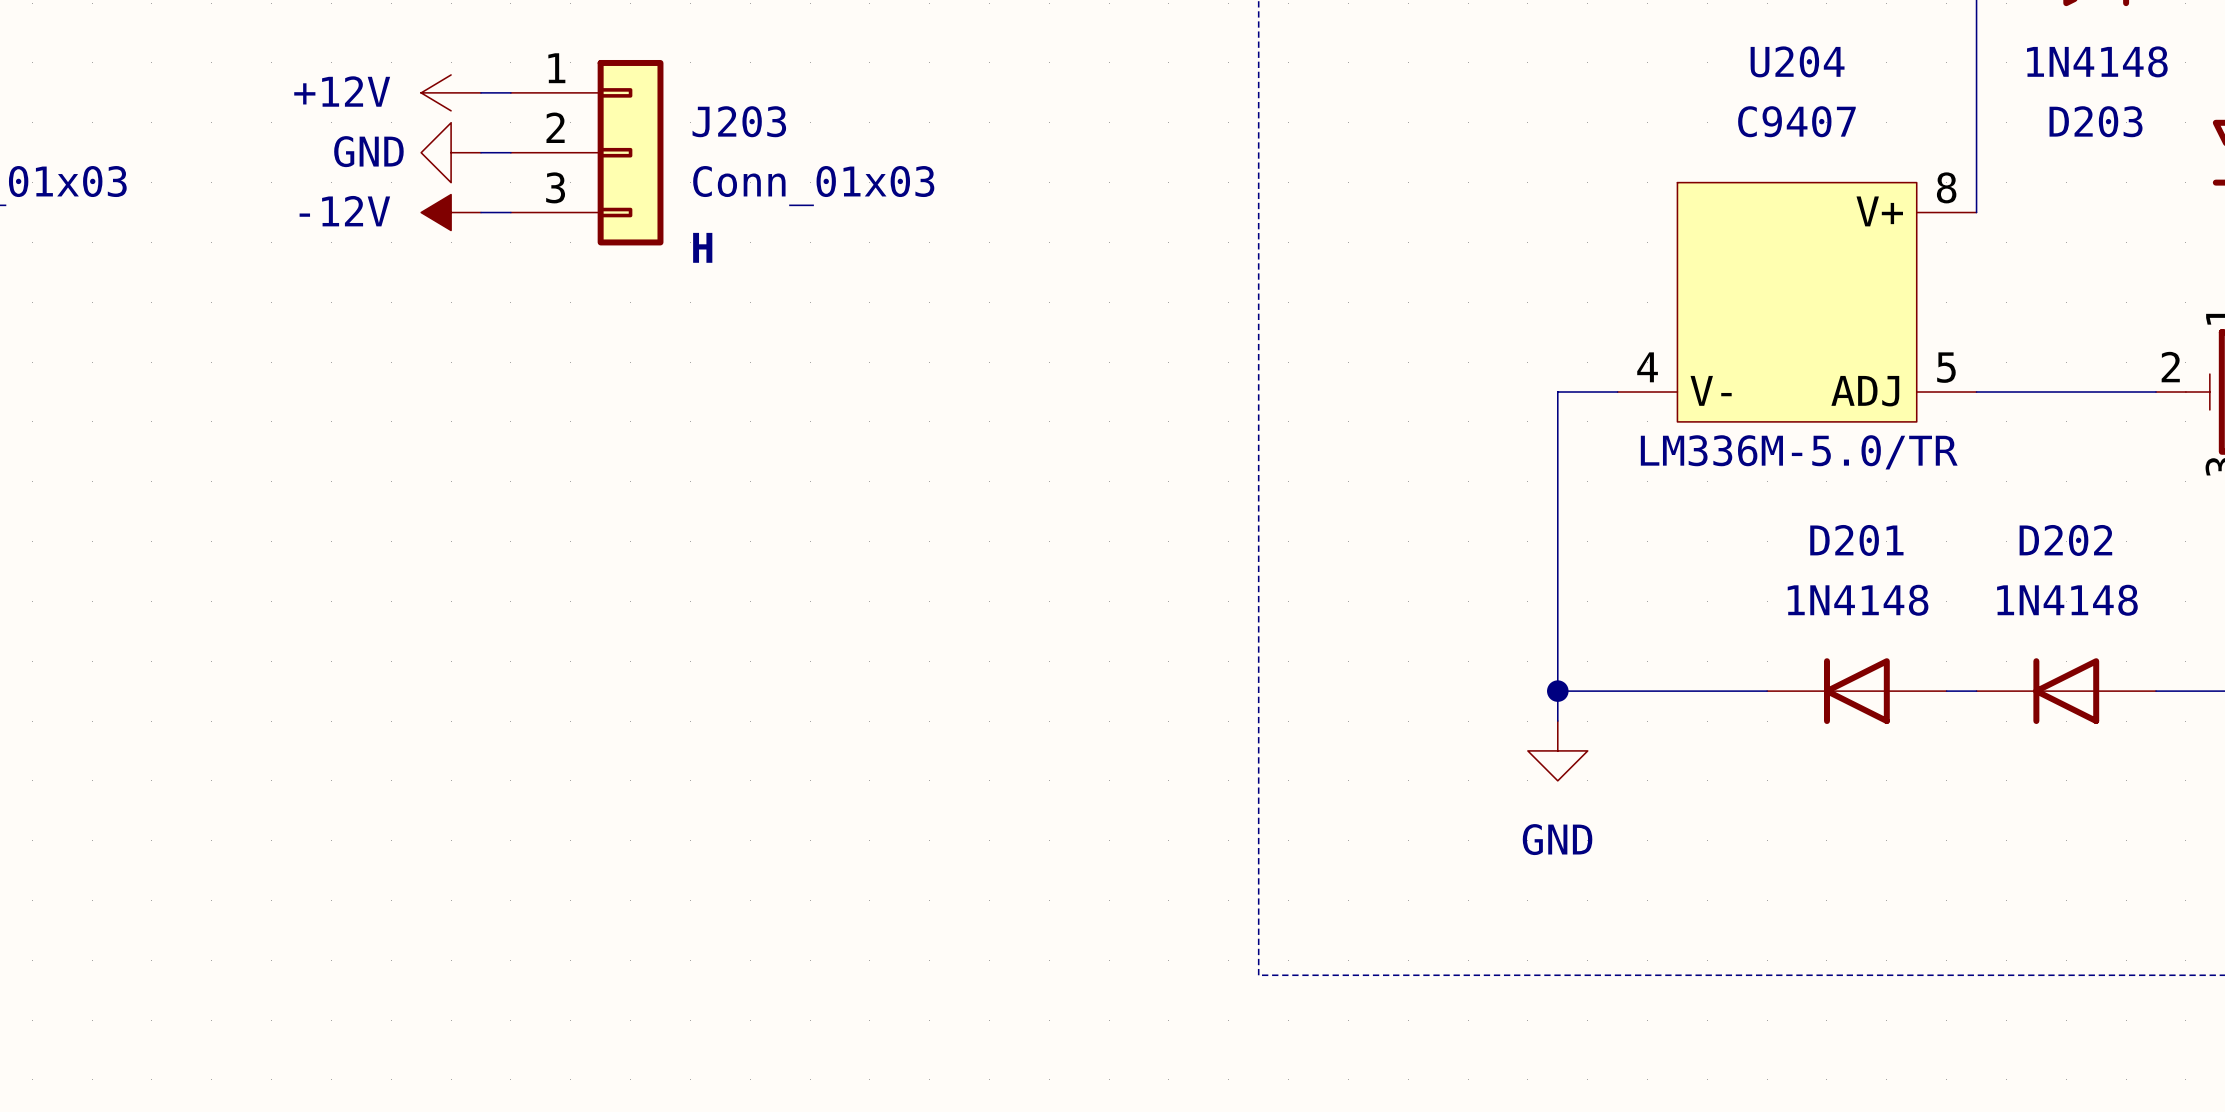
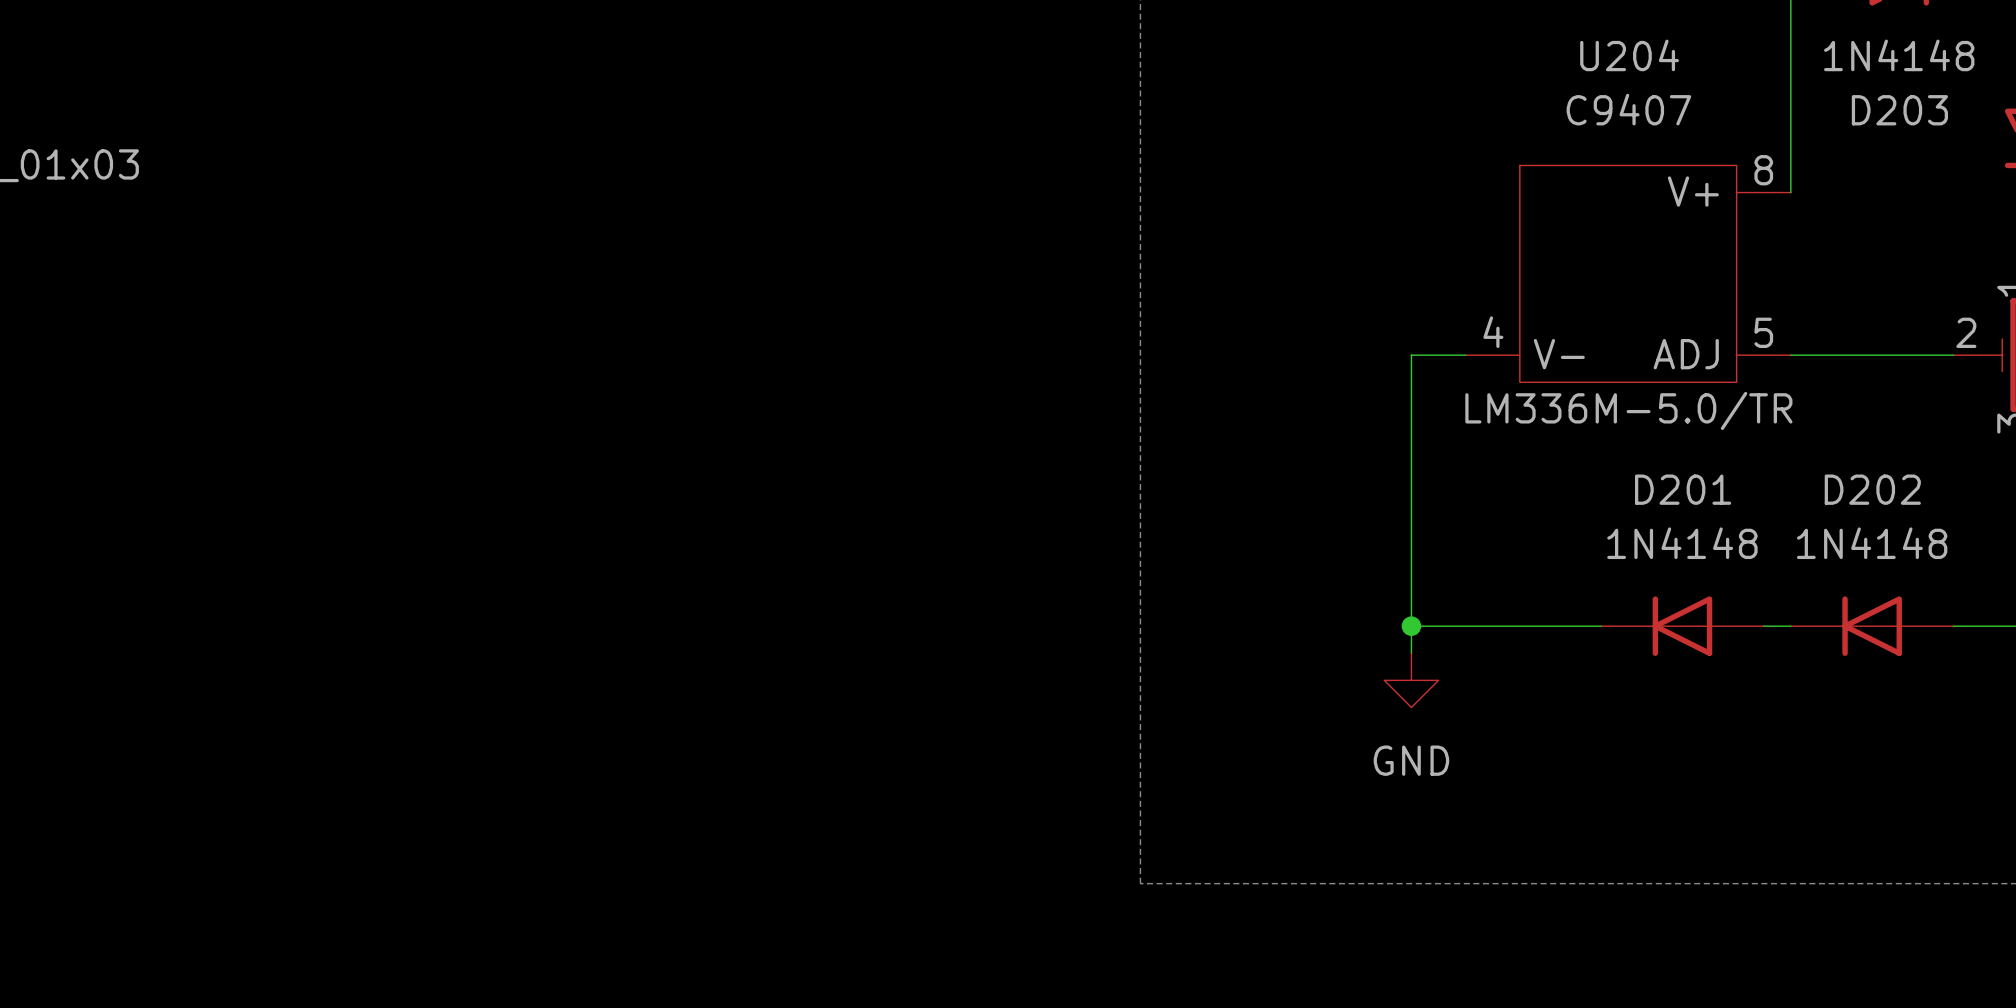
power symbol: +12V (451, 92) -> none
wire: (481, 92) (510, 92) -> none
power symbol: GND (451, 152) -> none
wire: (481, 152) (510, 152) -> none
J203: Conn_01x03 (587, 152) -> none
power symbol: -12V (451, 212) -> none
wire: (481, 212) (510, 212) -> none
text: H (702, 247) -> none

